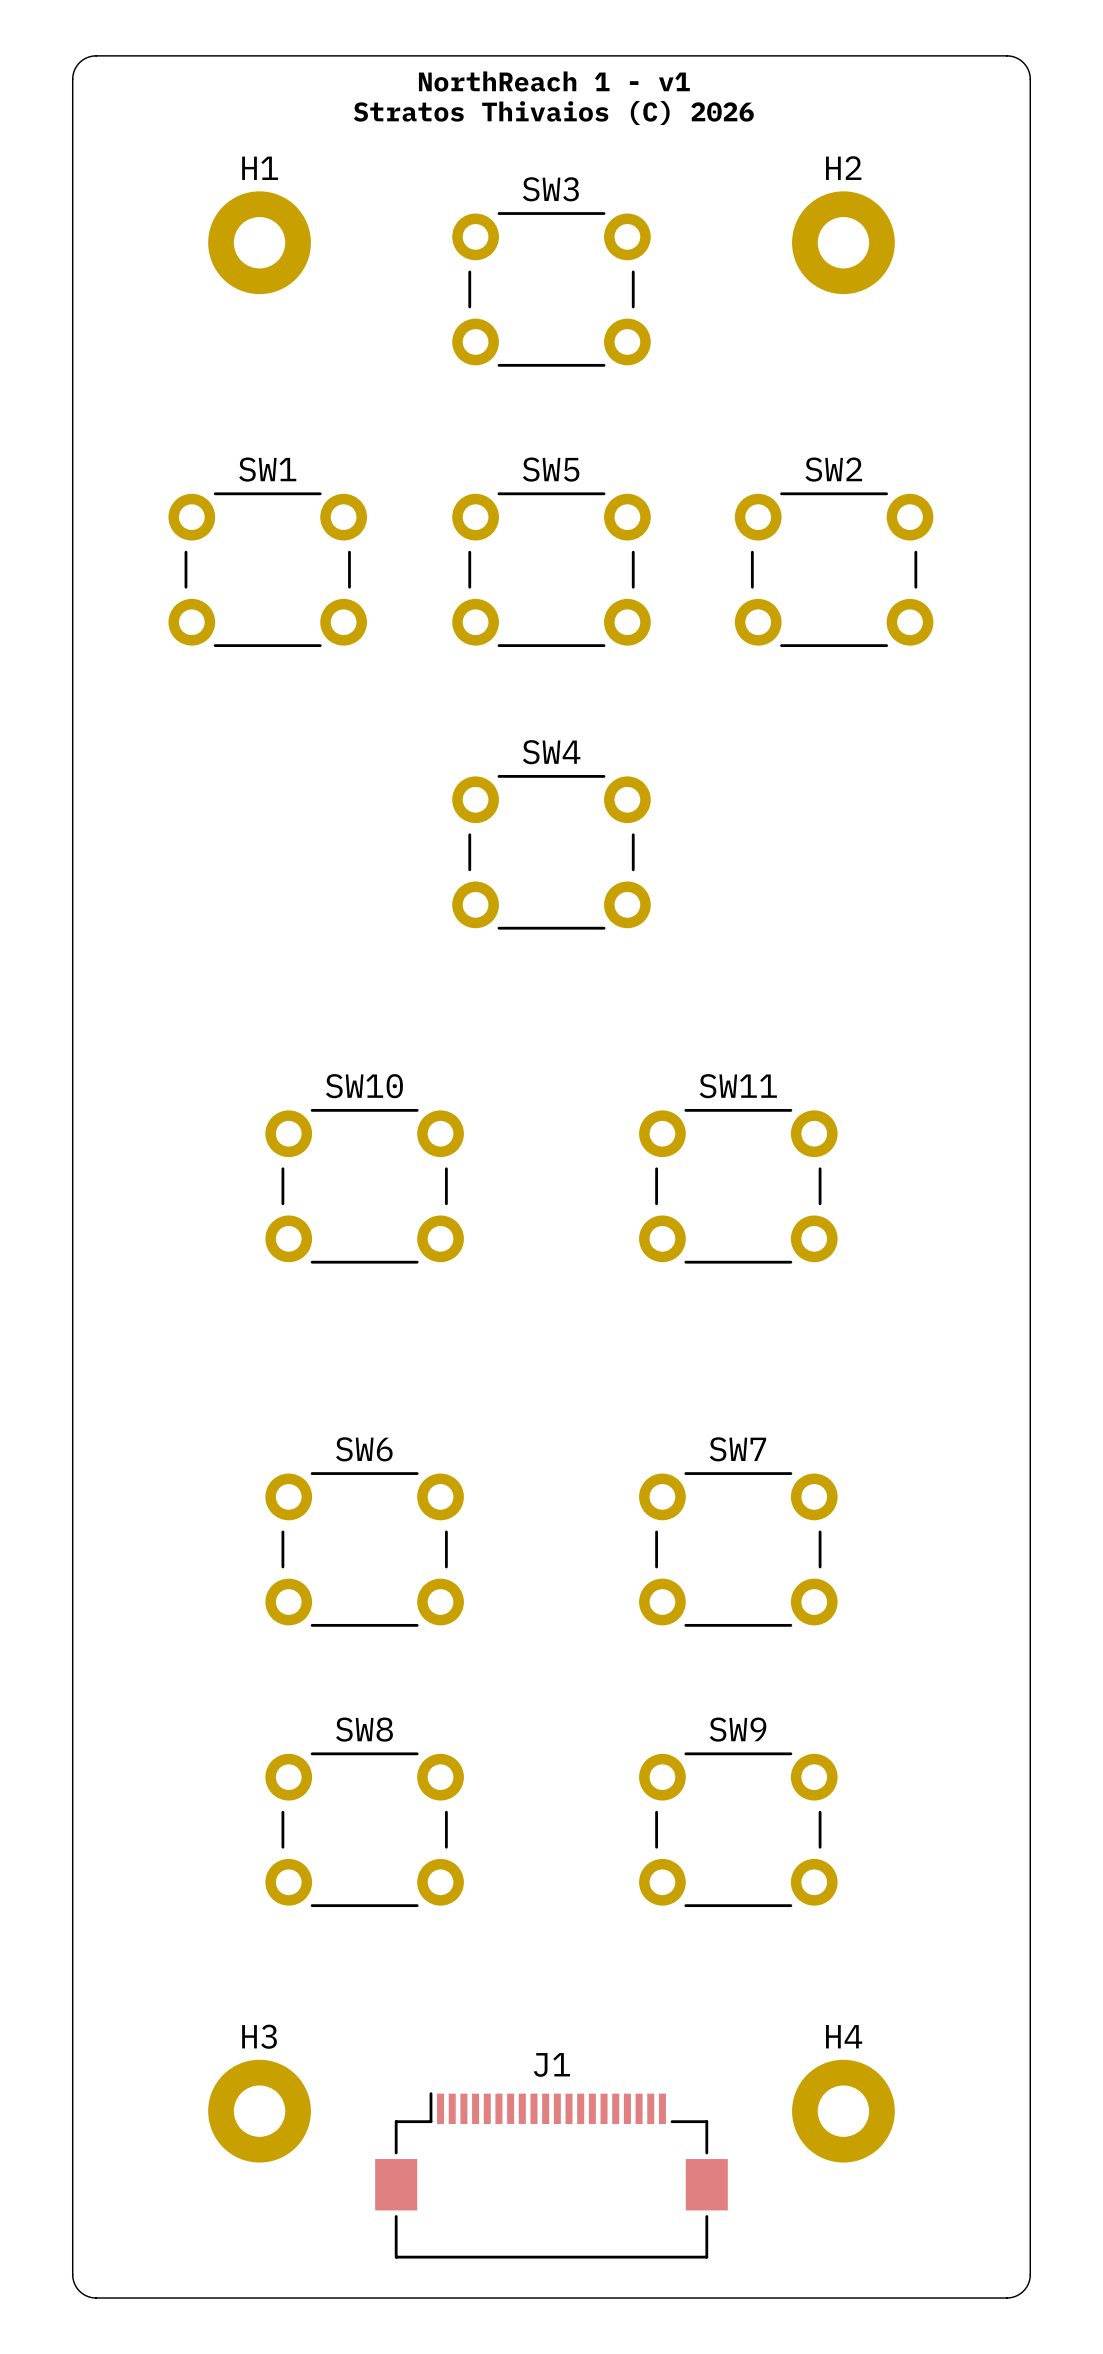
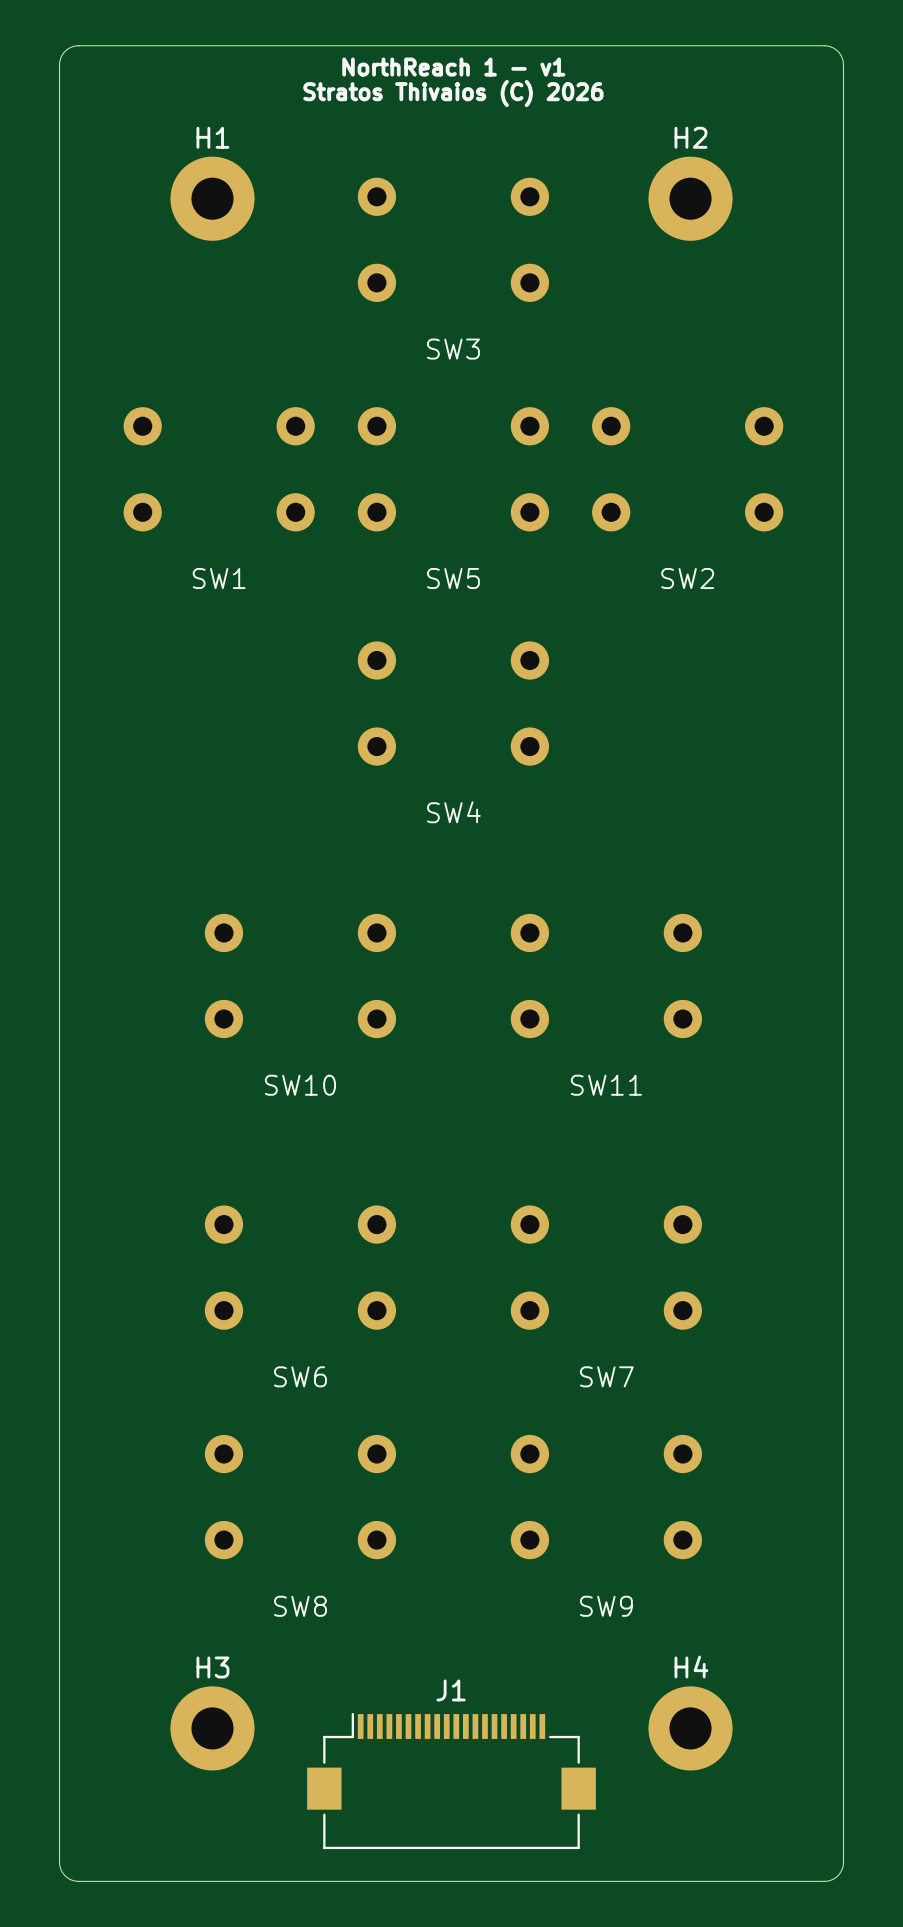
SW3 name position: SW3 (550, 189) -> SW3 (453, 349)
SW3 footprint: [452, 212, 651, 367] -> [357, 177, 550, 302]
SW1 name position: SW1 (267, 469) -> SW1 (219, 578)
SW5 name position: SW5 (551, 469) -> SW5 (453, 578)
SW2 name position: SW2 (833, 469) -> SW2 (687, 578)
SW1 footprint: [168, 492, 367, 648] -> [123, 407, 315, 532]
SW5 footprint: [452, 492, 651, 648] -> [357, 407, 550, 532]
SW2 footprint: [734, 492, 934, 648] -> [592, 407, 784, 532]
SW4 name position: SW4 (551, 752) -> SW4 (453, 812)
SW4 footprint: [452, 774, 651, 930] -> [357, 641, 550, 766]
SW10 name position: SW10 (364, 1086) -> SW10 (300, 1085)
SW11 name position: SW11 (738, 1086) -> SW11 (606, 1085)
SW10 footprint: [265, 1108, 464, 1264] -> [204, 913, 397, 1039]
SW11 footprint: [639, 1108, 838, 1264] -> [510, 913, 703, 1039]
SW6 name position: SW6 (364, 1449) -> SW6 (300, 1376)
SW7 name position: SW7 (737, 1449) -> SW7 (606, 1376)
SW6 footprint: [265, 1472, 464, 1627] -> [204, 1205, 397, 1330]
SW7 footprint: [639, 1472, 838, 1627] -> [510, 1205, 703, 1330]
SW8 name position: SW8 (364, 1729) -> SW8 (300, 1606)
SW9 name position: SW9 (738, 1729) -> SW9 (606, 1606)
SW8 footprint: [265, 1752, 464, 1908] -> [204, 1434, 397, 1560]
SW9 footprint: [639, 1752, 838, 1908] -> [510, 1434, 703, 1560]

